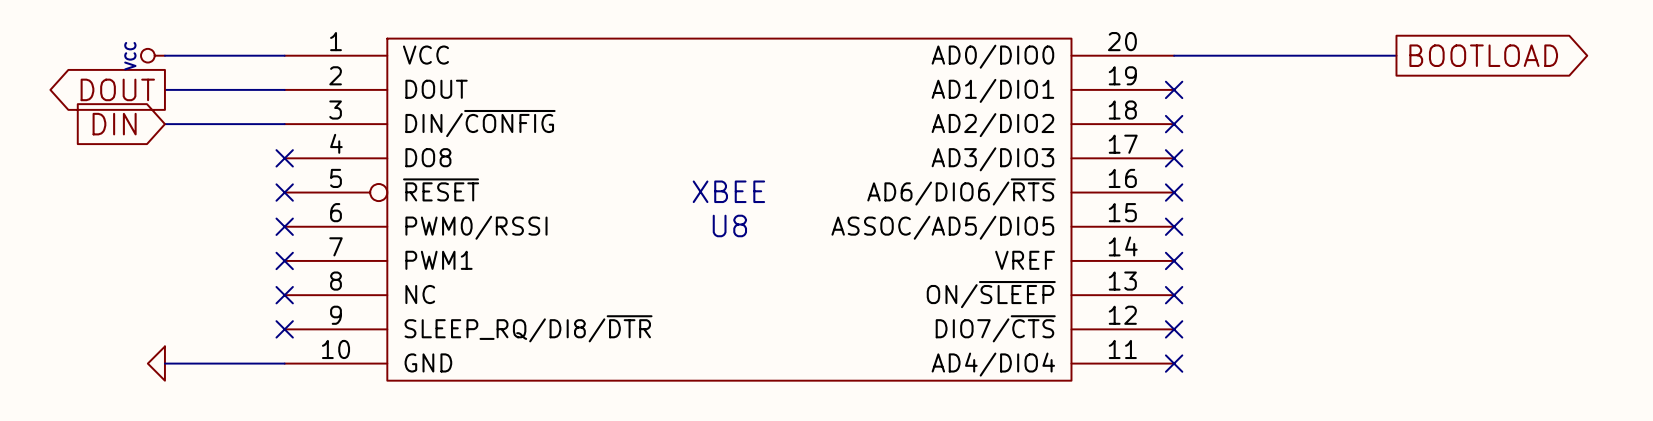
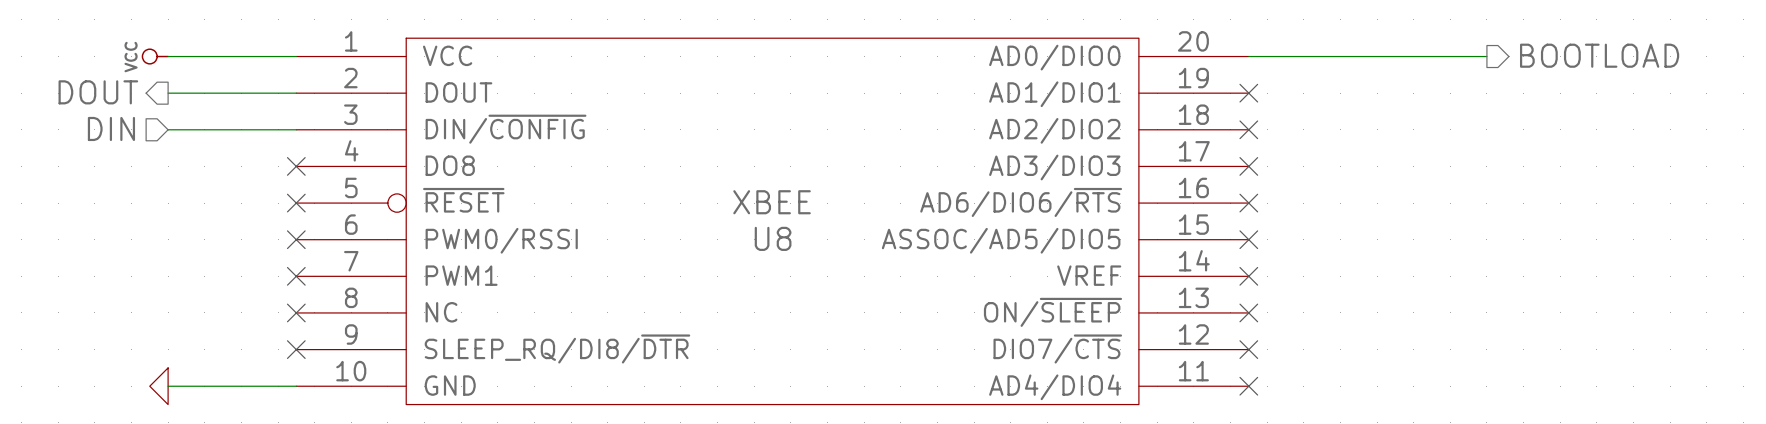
hierarchical label: none -> BOOTLOAD (1599, 55)
global label: BOOTLOAD (1483, 55) -> none
hierarchical label: none -> DOUT (98, 92)
global label: DOUT (117, 89) -> none
hierarchical label: none -> DIN (111, 128)
global label: DIN (114, 124) -> none

